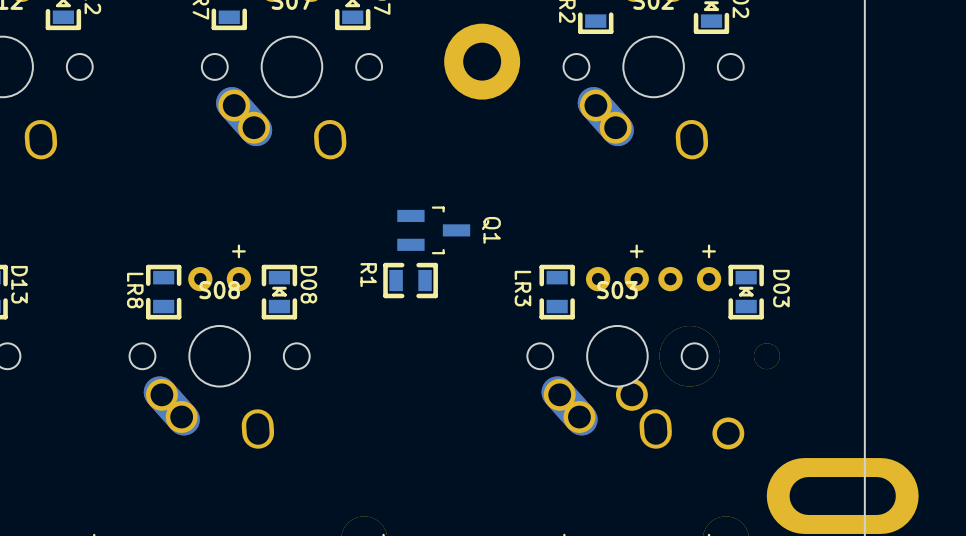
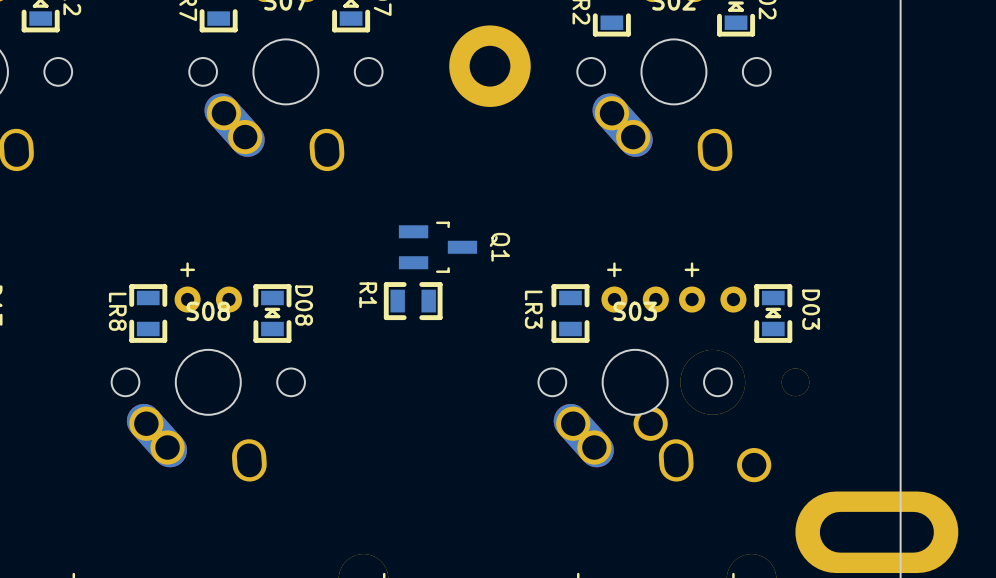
part text position: + (238, 251) -> + (187, 269)
part text position: + (636, 251) -> + (614, 269)
part text position: + (709, 251) -> + (692, 269)

